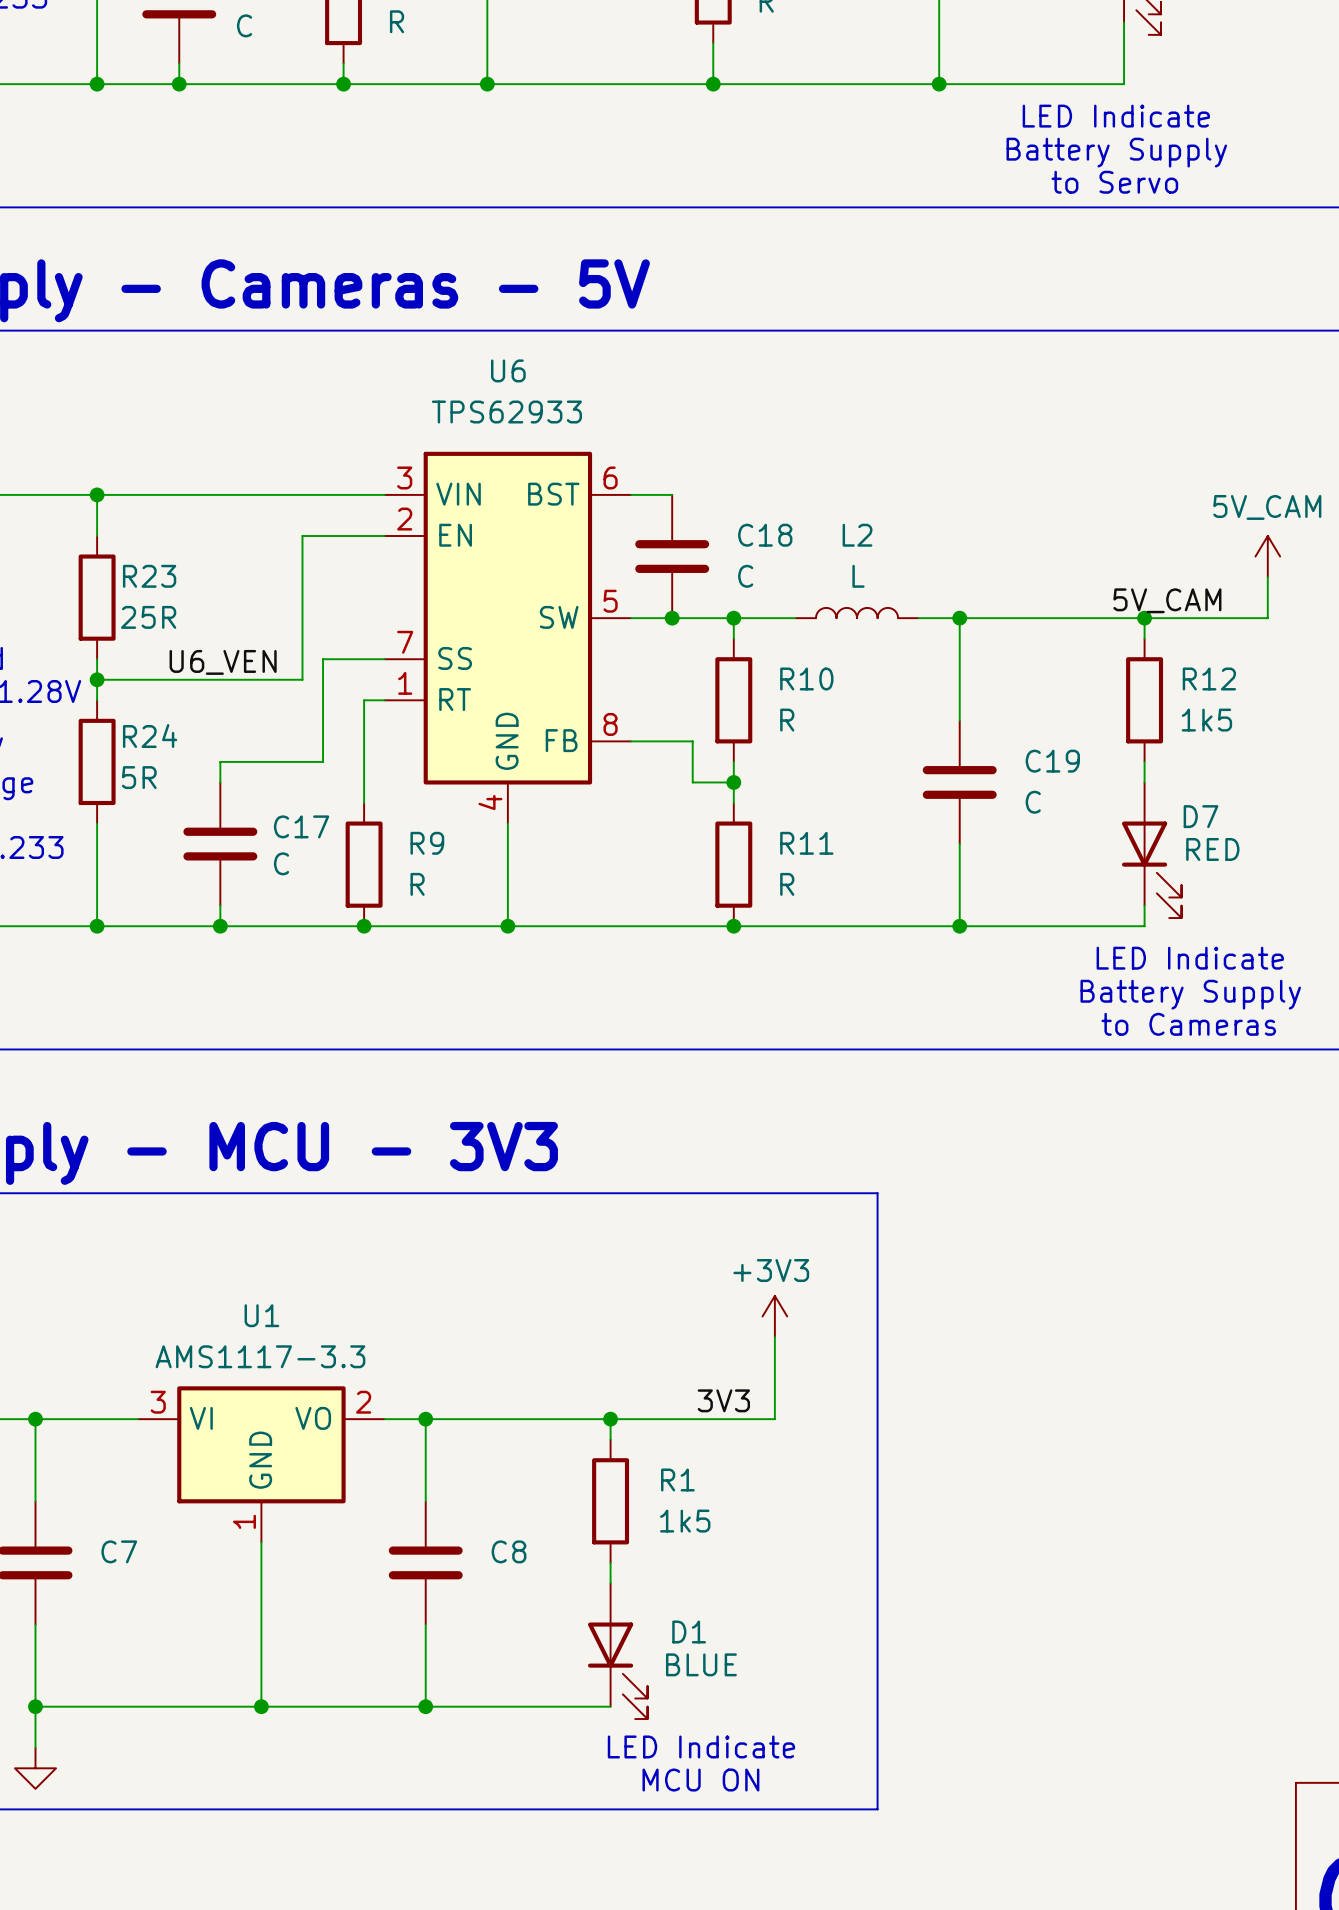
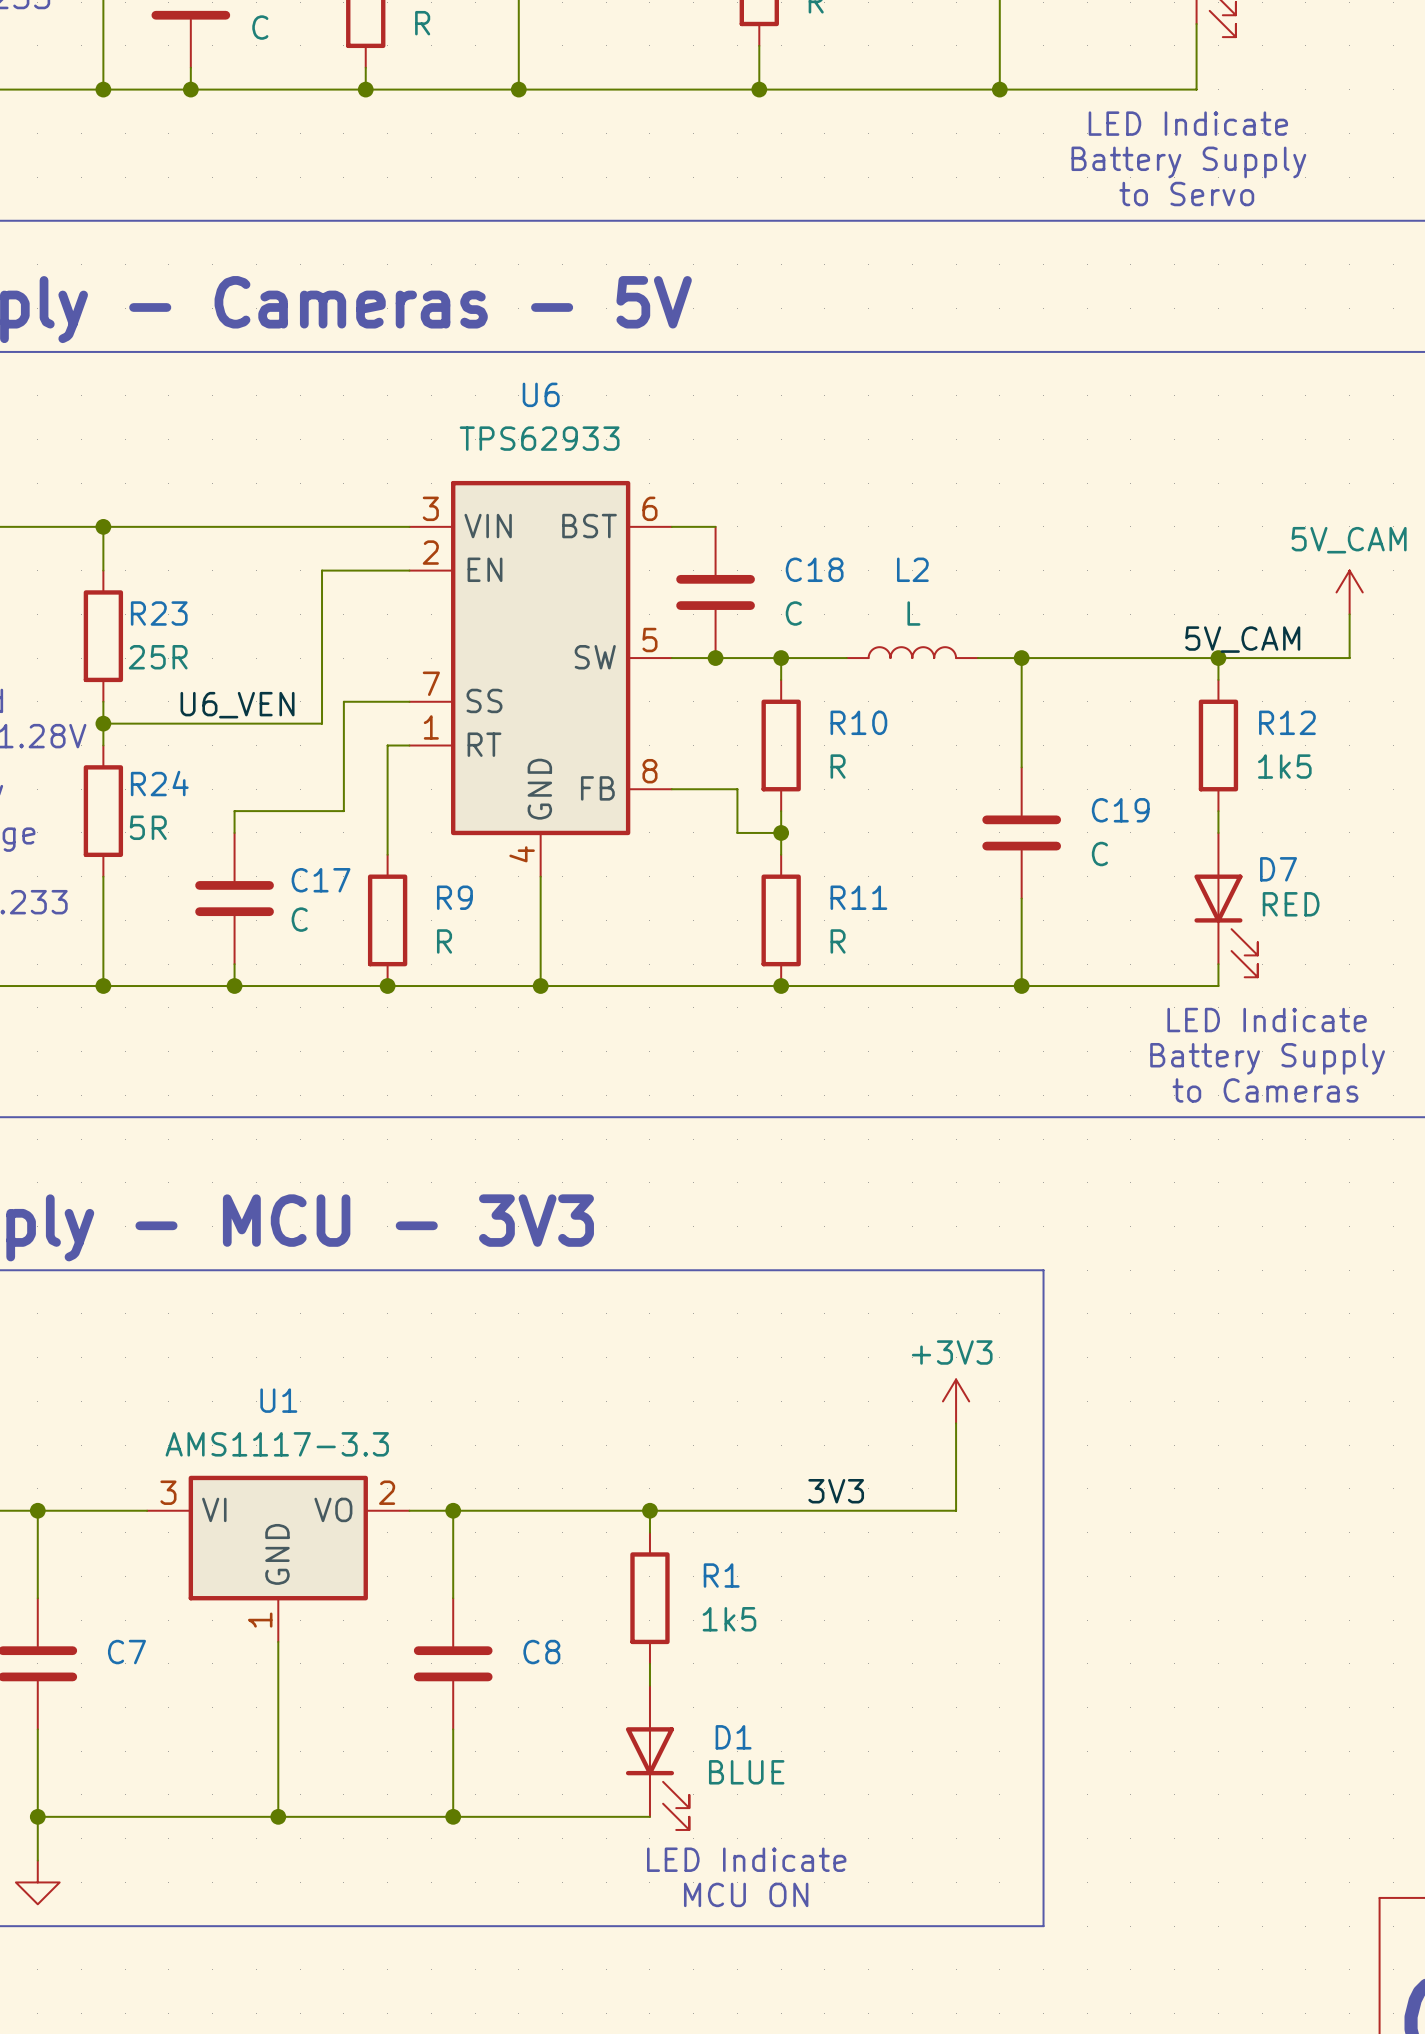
line: (877, 1193) (877, 1809) -> (934, 1270) (1043, 1270) (1043, 1926) (934, 1926)
power symbol position: +3V3 (774, 1316) -> +3V3 (956, 1401)
wire: (774, 1337) (774, 1419) -> (956, 1423) (956, 1510) (824, 1510)
label position: 3V3 (723, 1400) -> 3V3 (836, 1491)

